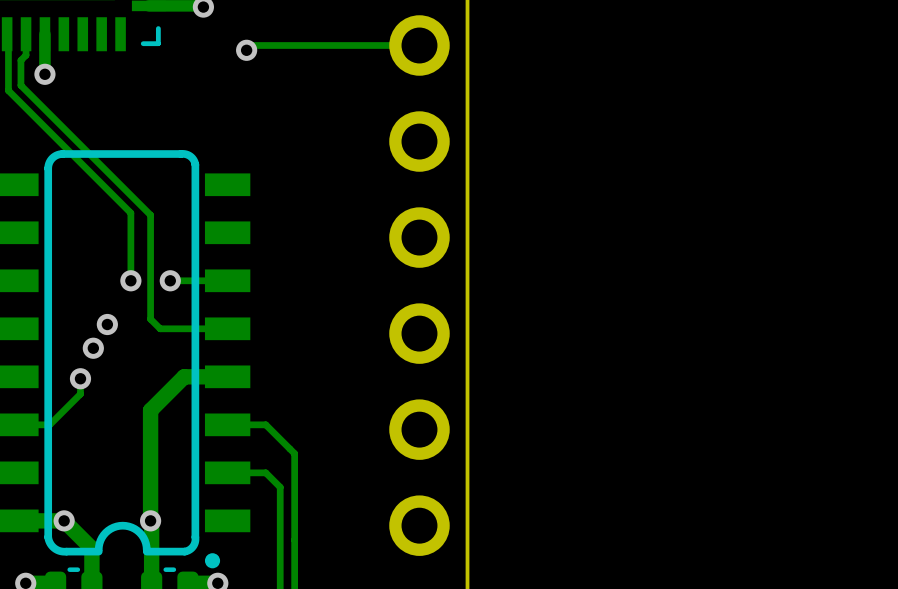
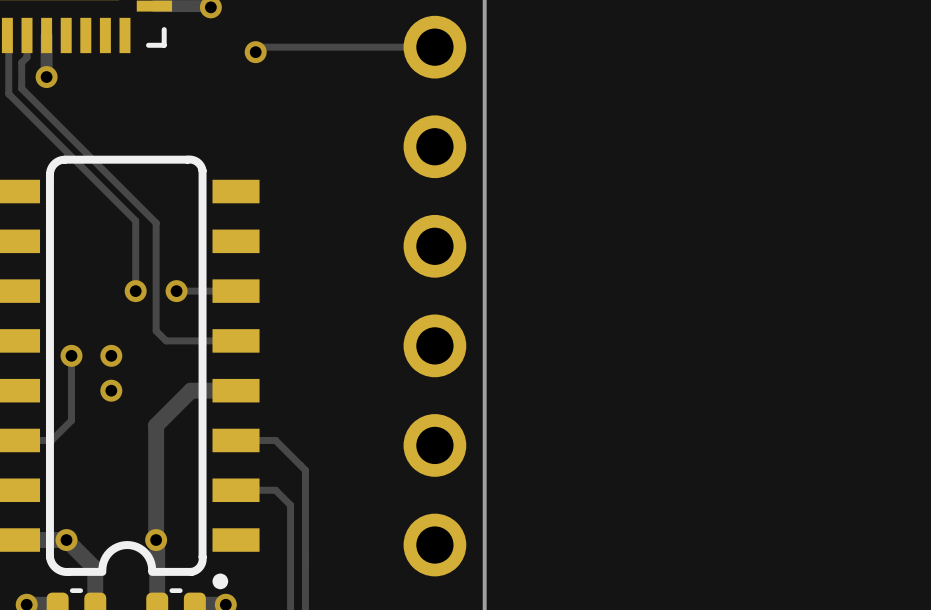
via: (107, 324) -> none
via: none -> (71, 355)
via: none -> (111, 355)
via: (93, 348) -> none
via: none -> (111, 390)
track: (80, 378) (80, 394) (68, 405) -> (71, 355) (71, 420)
via: (80, 378) -> none

